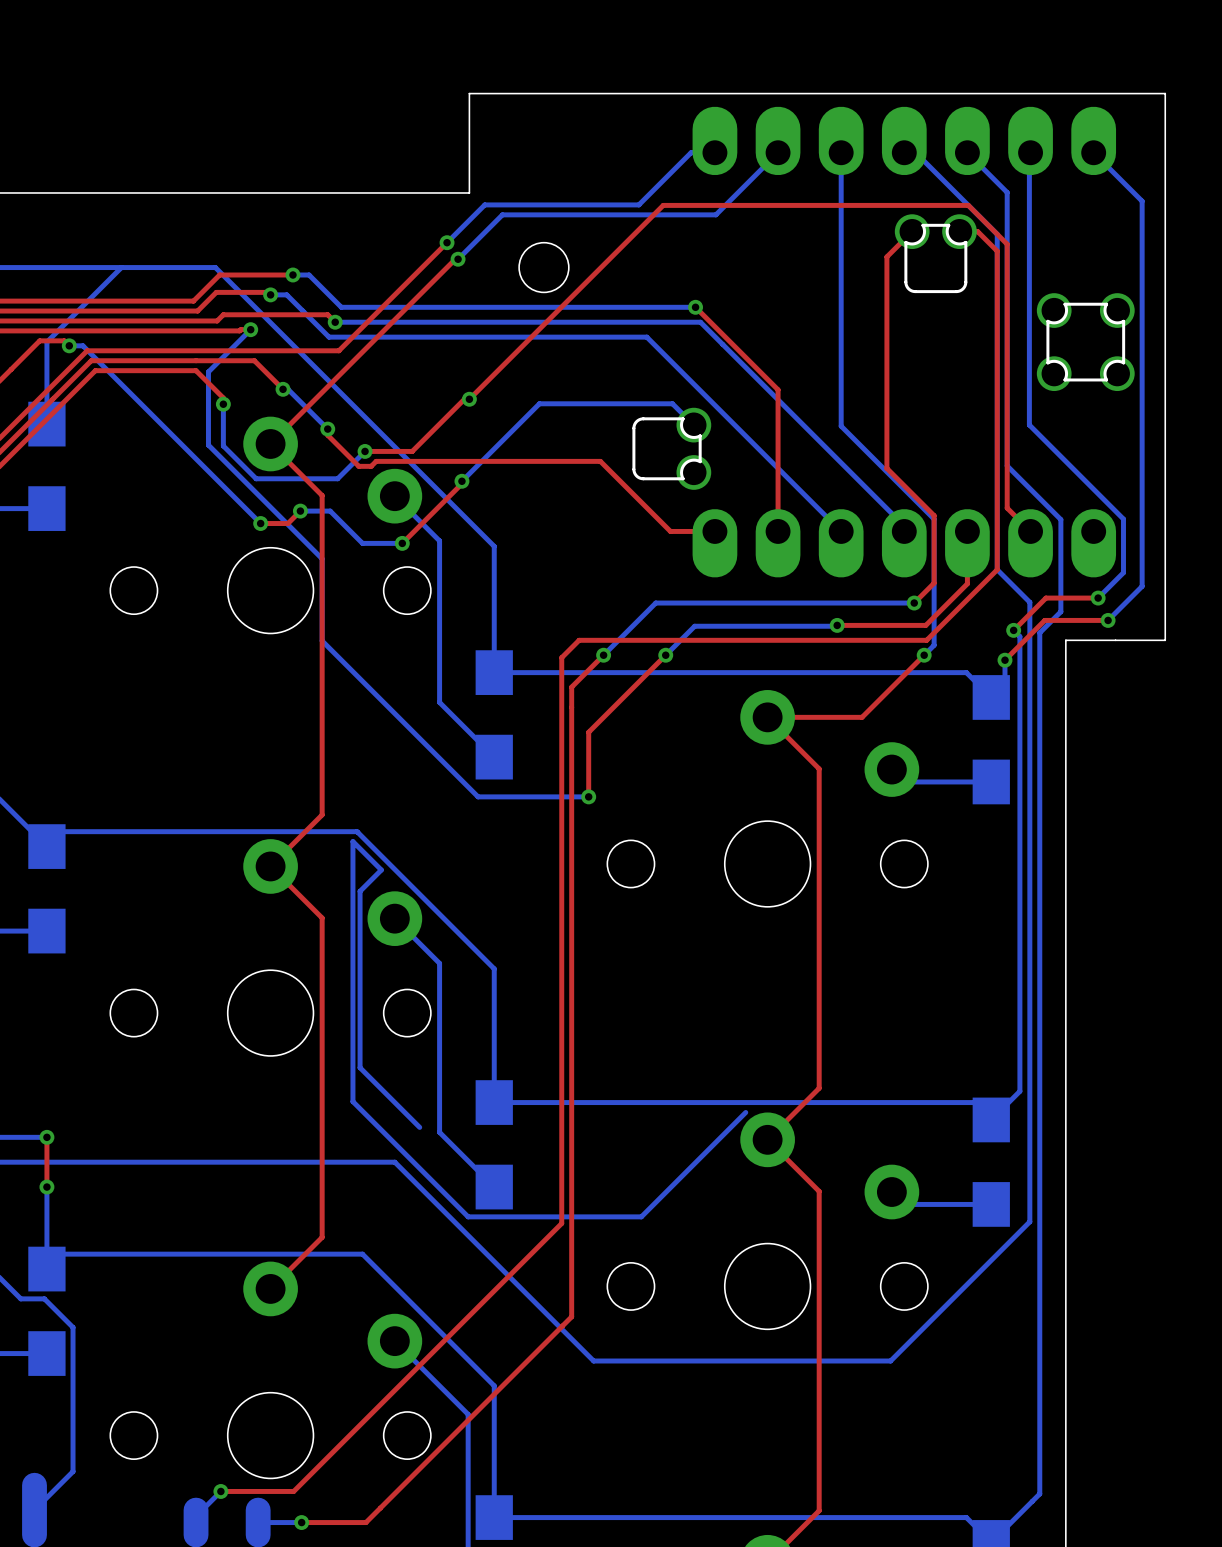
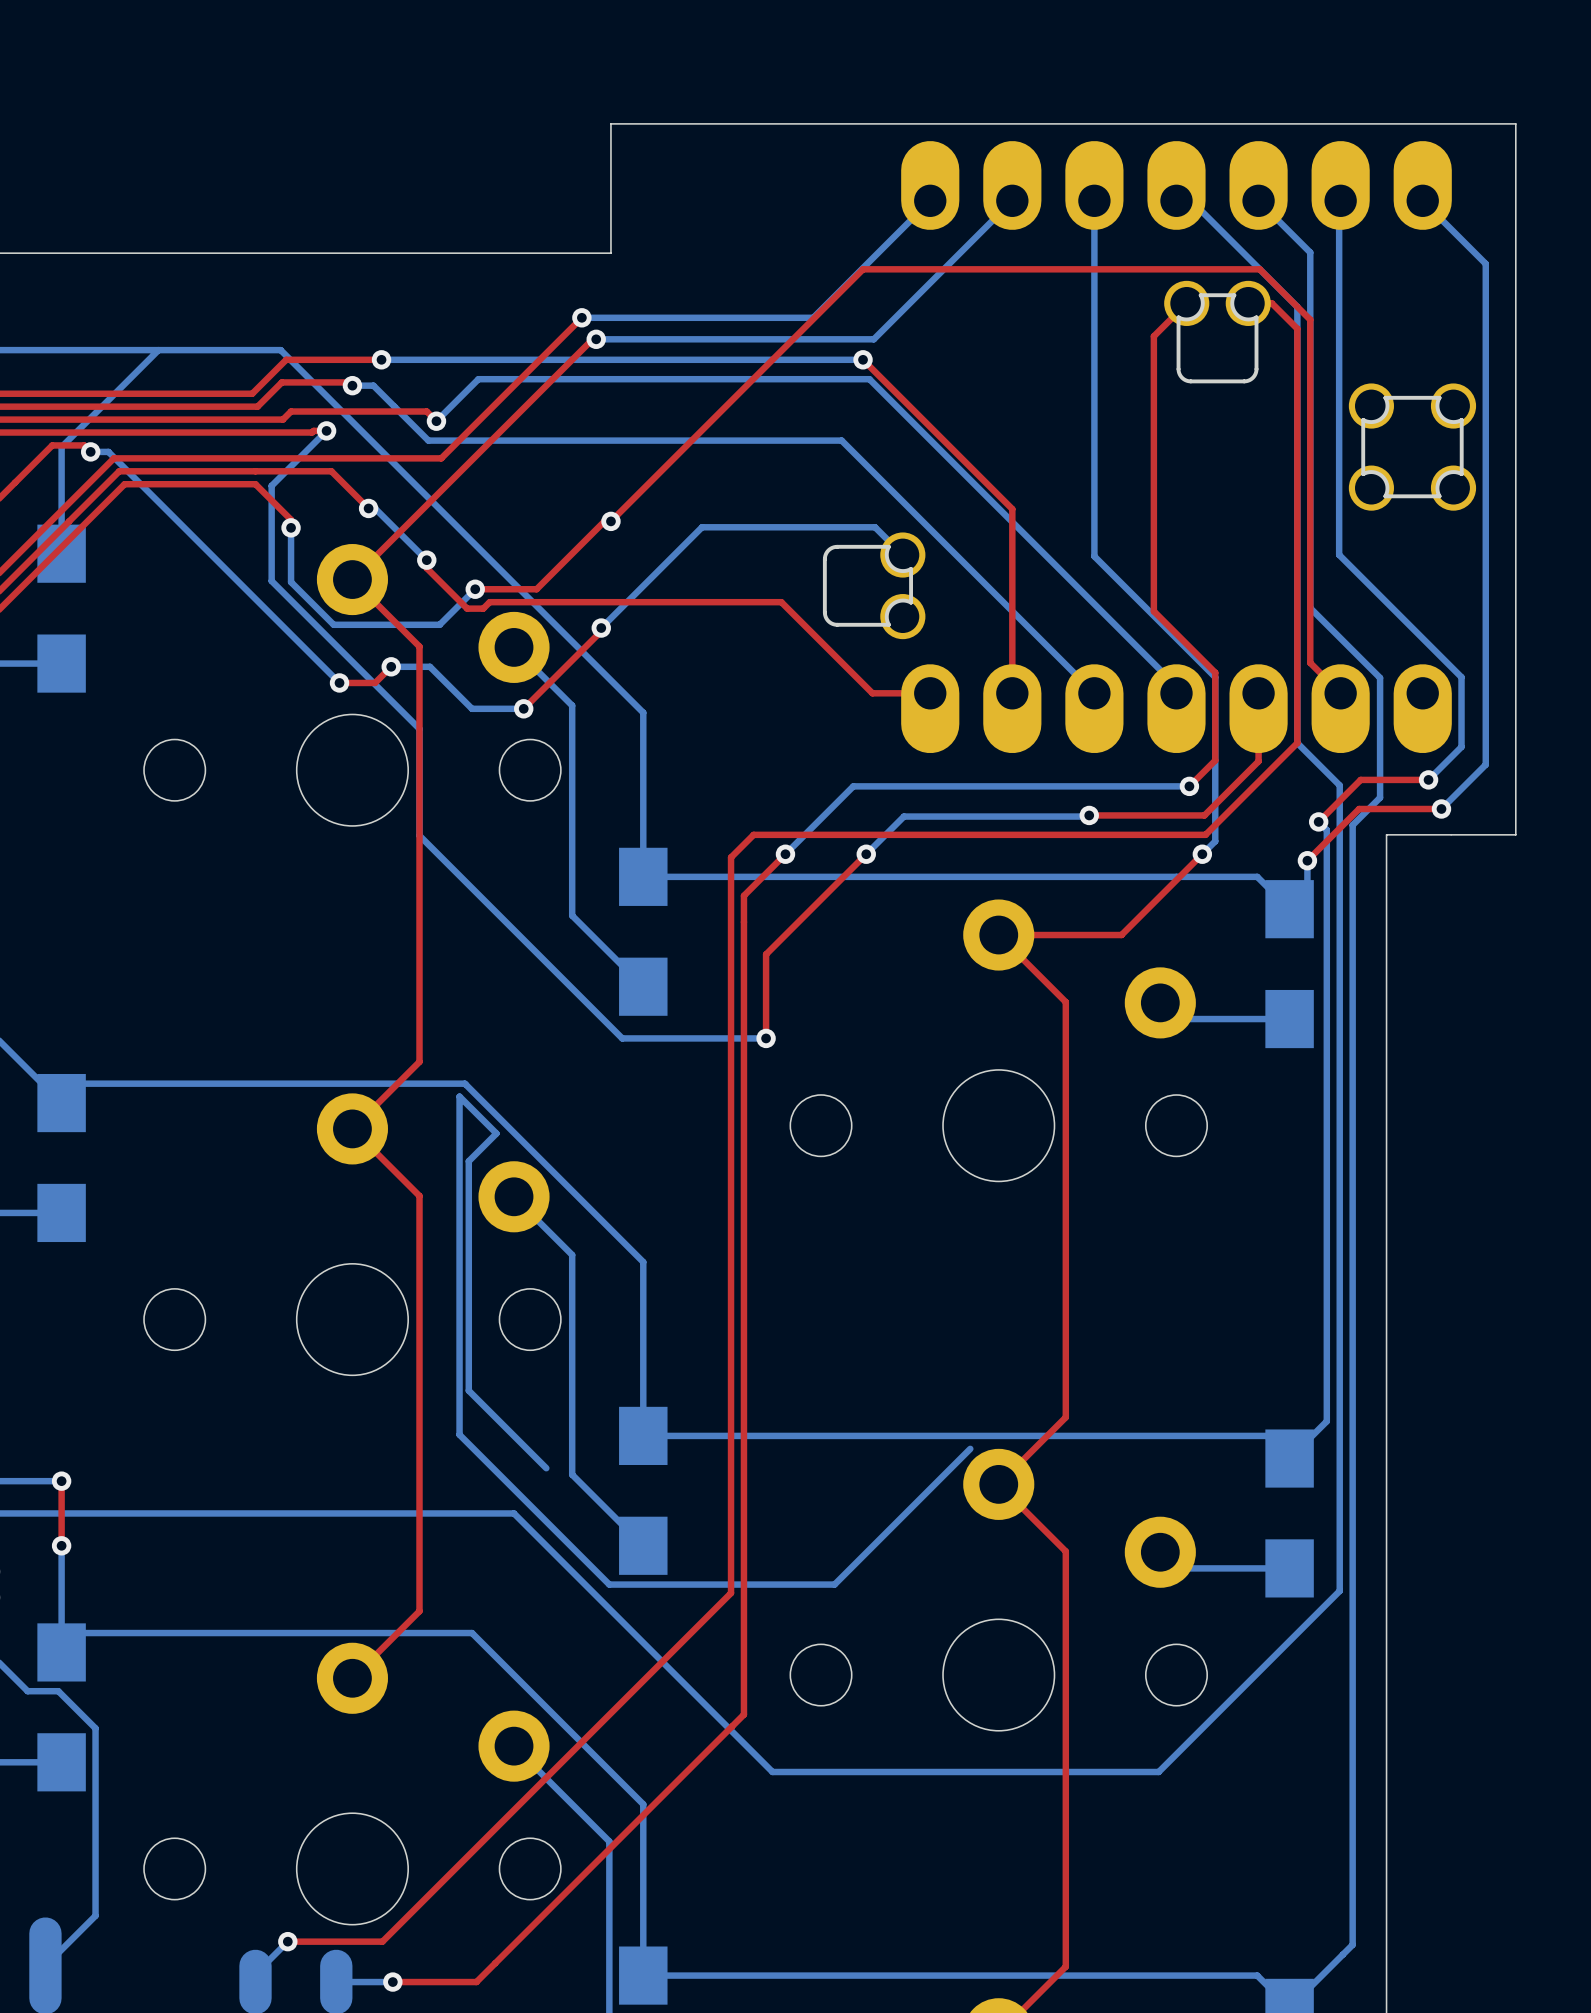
bottom track: (714, 152) (691, 152) (638, 204) (484, 204) (447, 242) -> (930, 200) (813, 317) (581, 317)
bottom track: (715, 214) (502, 214) (458, 259) -> (931, 281) (873, 339) (596, 339)
round board edge: [518, 242, 570, 294] -> none
bottom track: (309, 275) (341, 307) (695, 307) -> (402, 359) (863, 359)
top track: none -> (863, 359) (905, 401)
via position: (695, 307) -> (863, 359)
bottom track: (335, 322) (700, 322) -> (436, 421) (478, 379) (869, 379) (911, 421)

